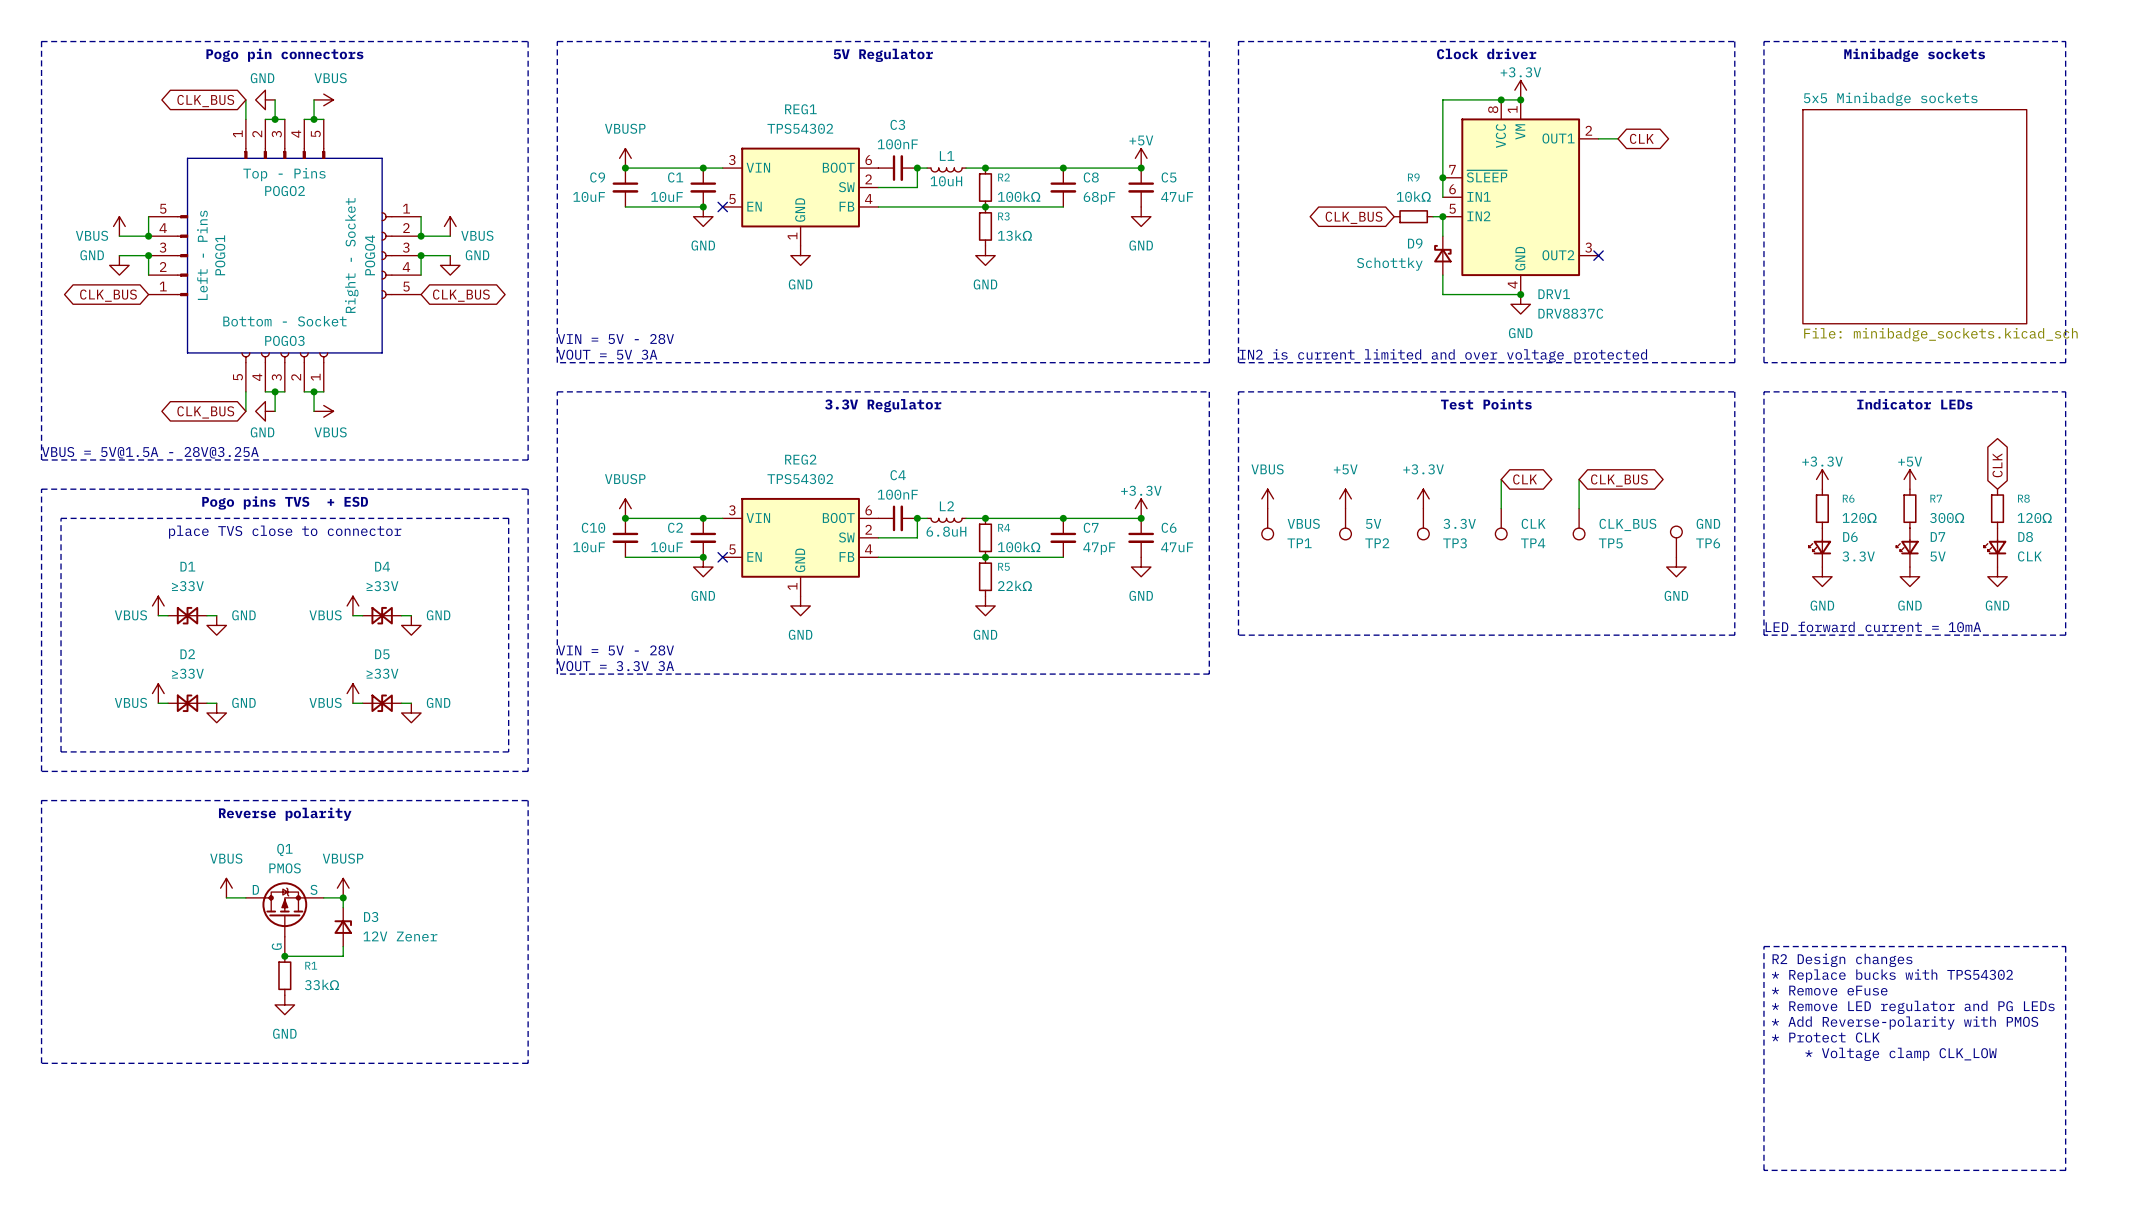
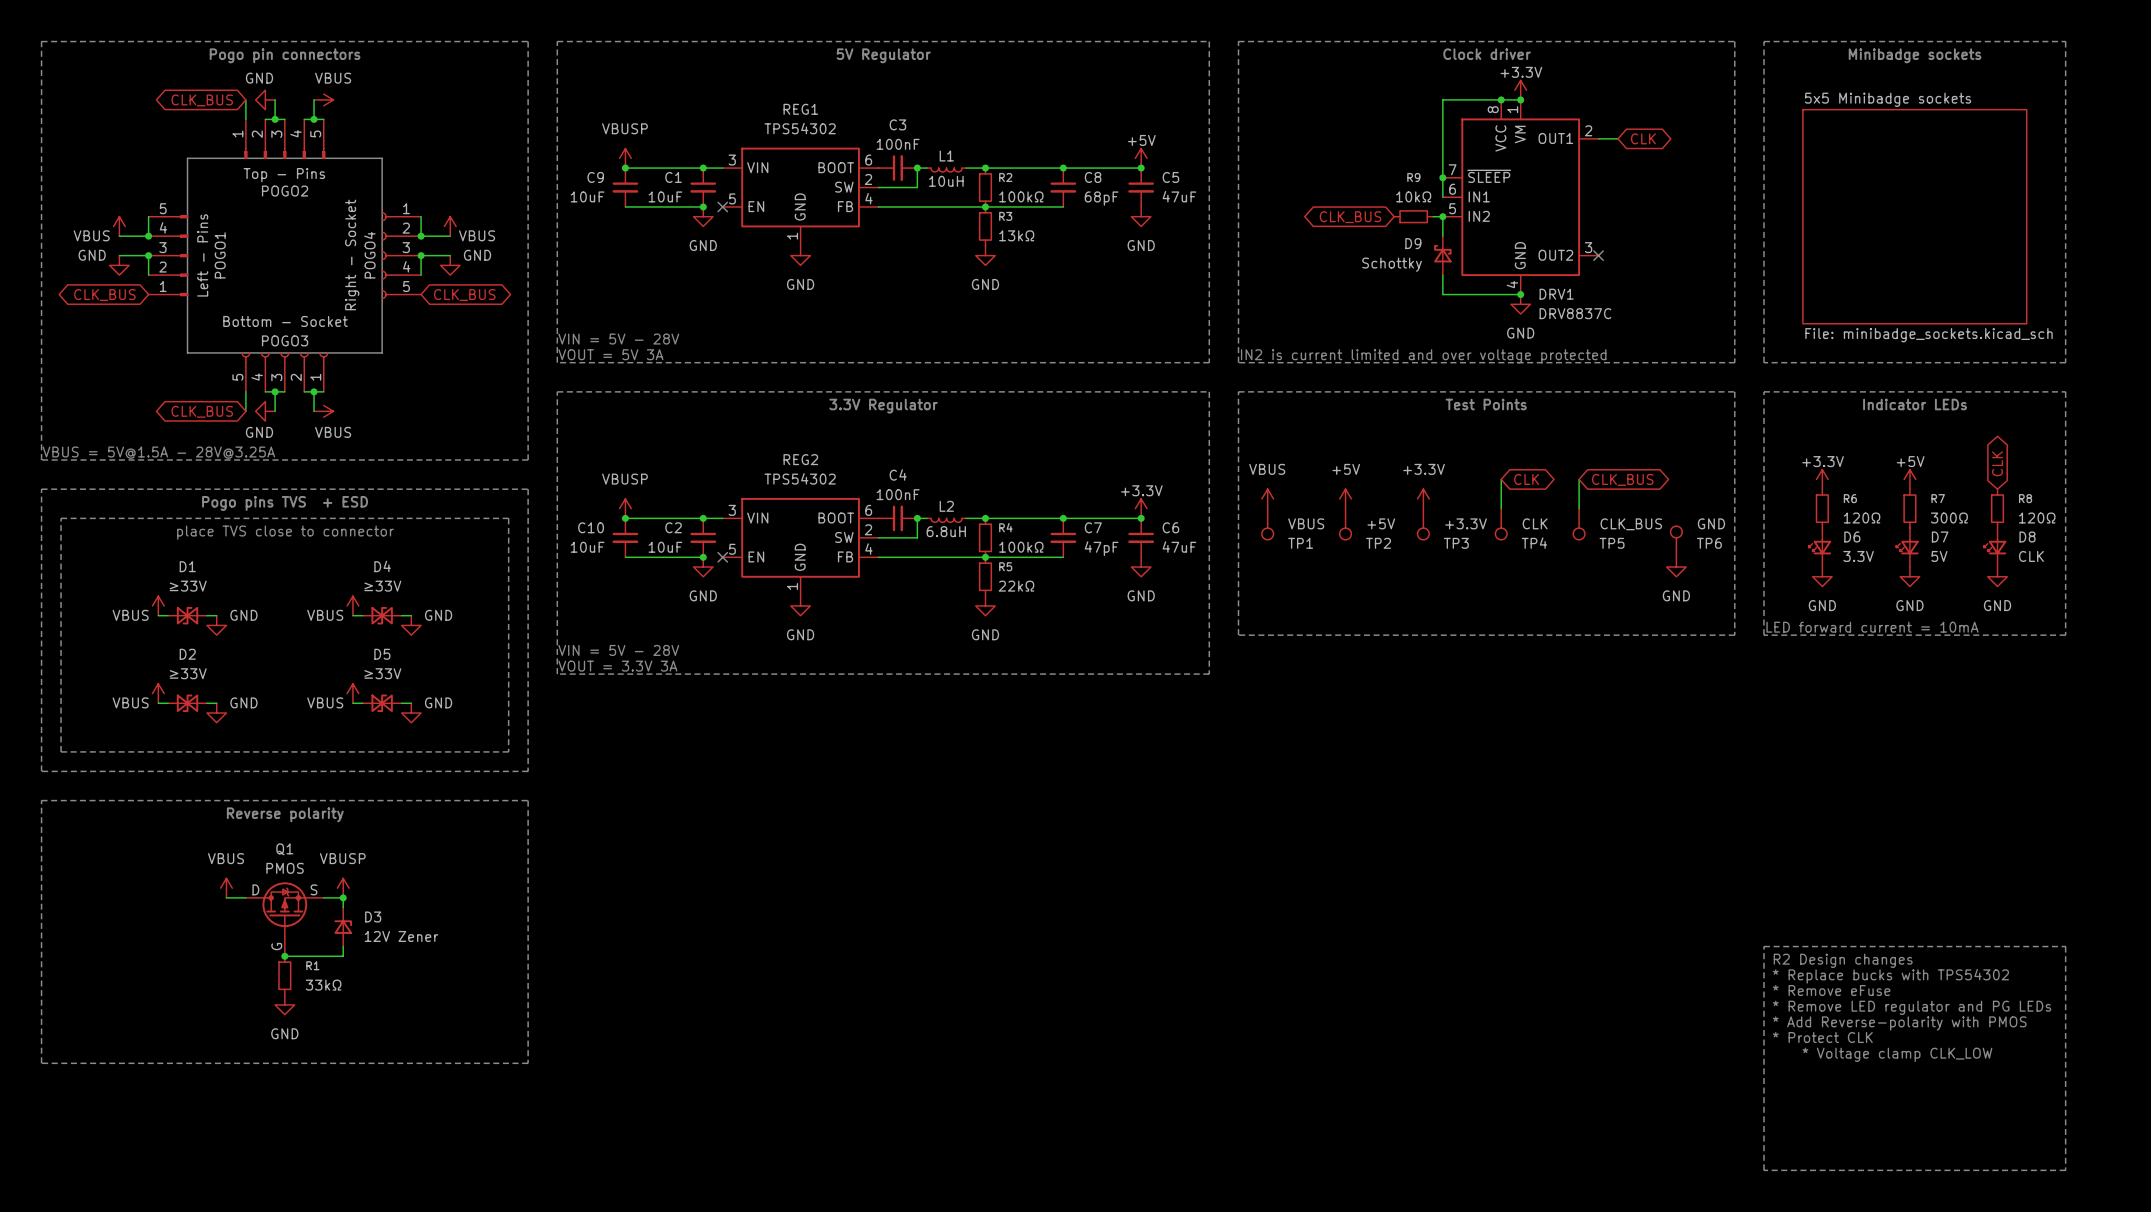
TP2 value: 5V (1373, 523) -> +5V (1381, 523)
TP3 value: 3.3V (1459, 523) -> +3.3V (1466, 523)

